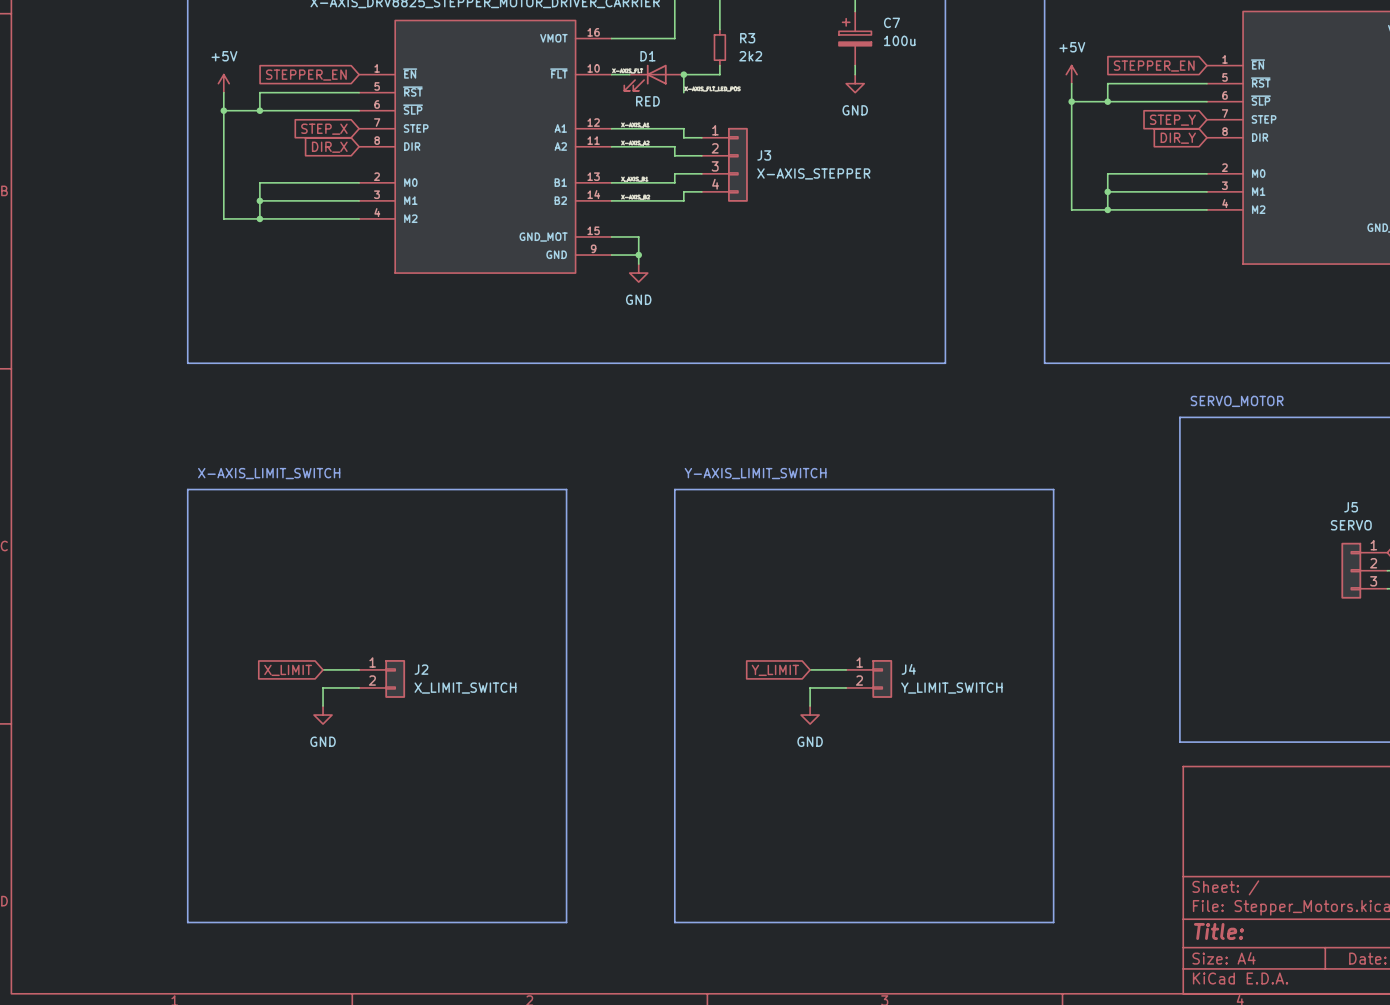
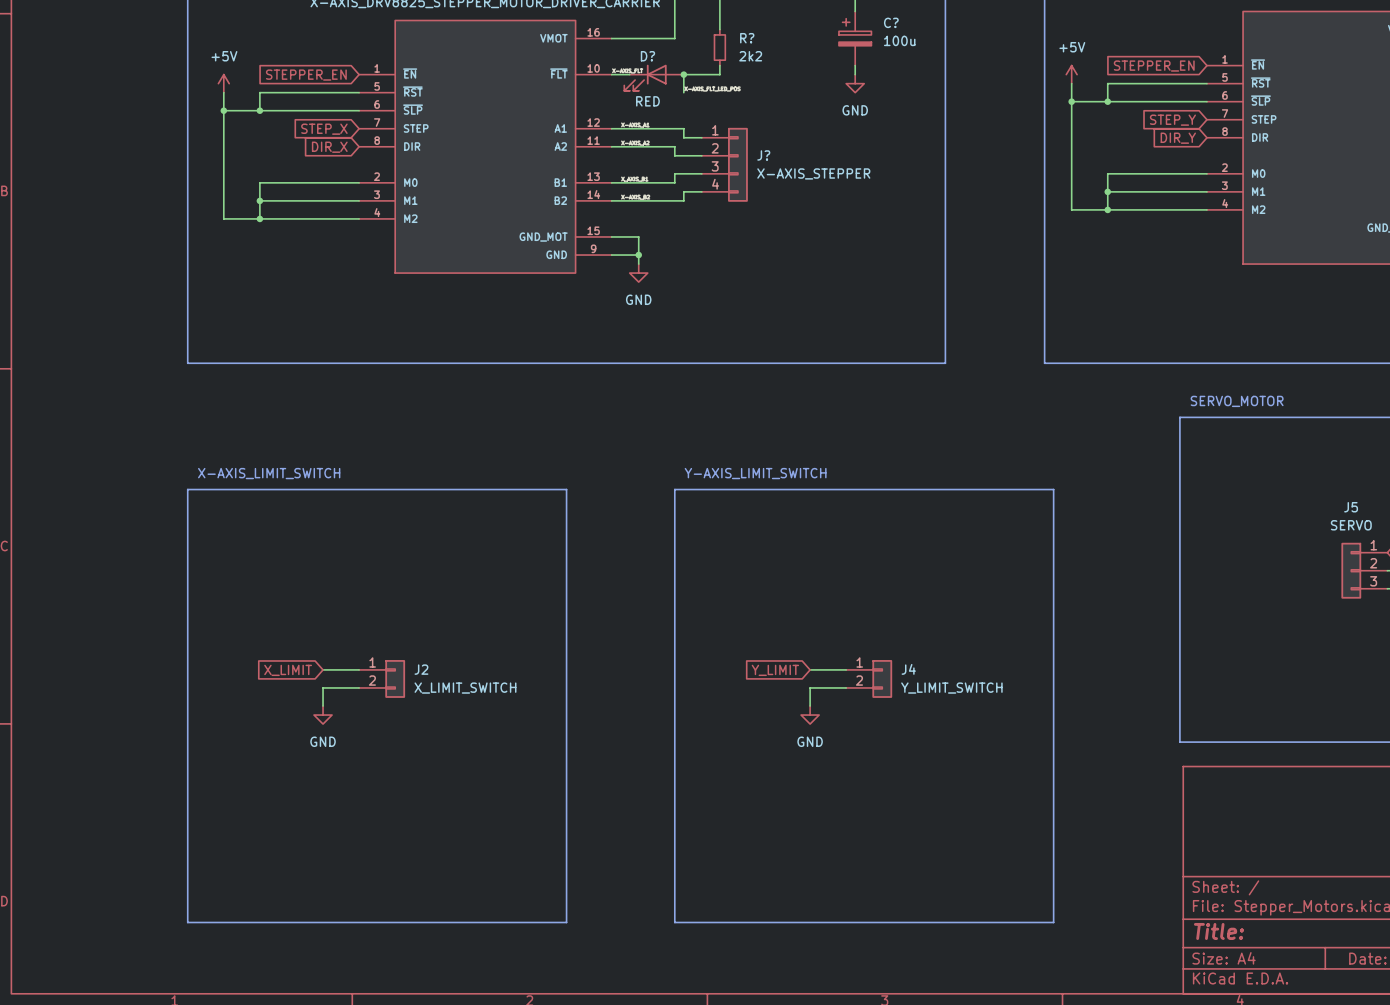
C7 name: C7 (891, 22) -> C? (891, 22)
R3 name: R3 (747, 38) -> R? (747, 38)
D1 name: D1 (647, 56) -> D? (647, 56)
J3 name: J3 (764, 155) -> J? (763, 155)

